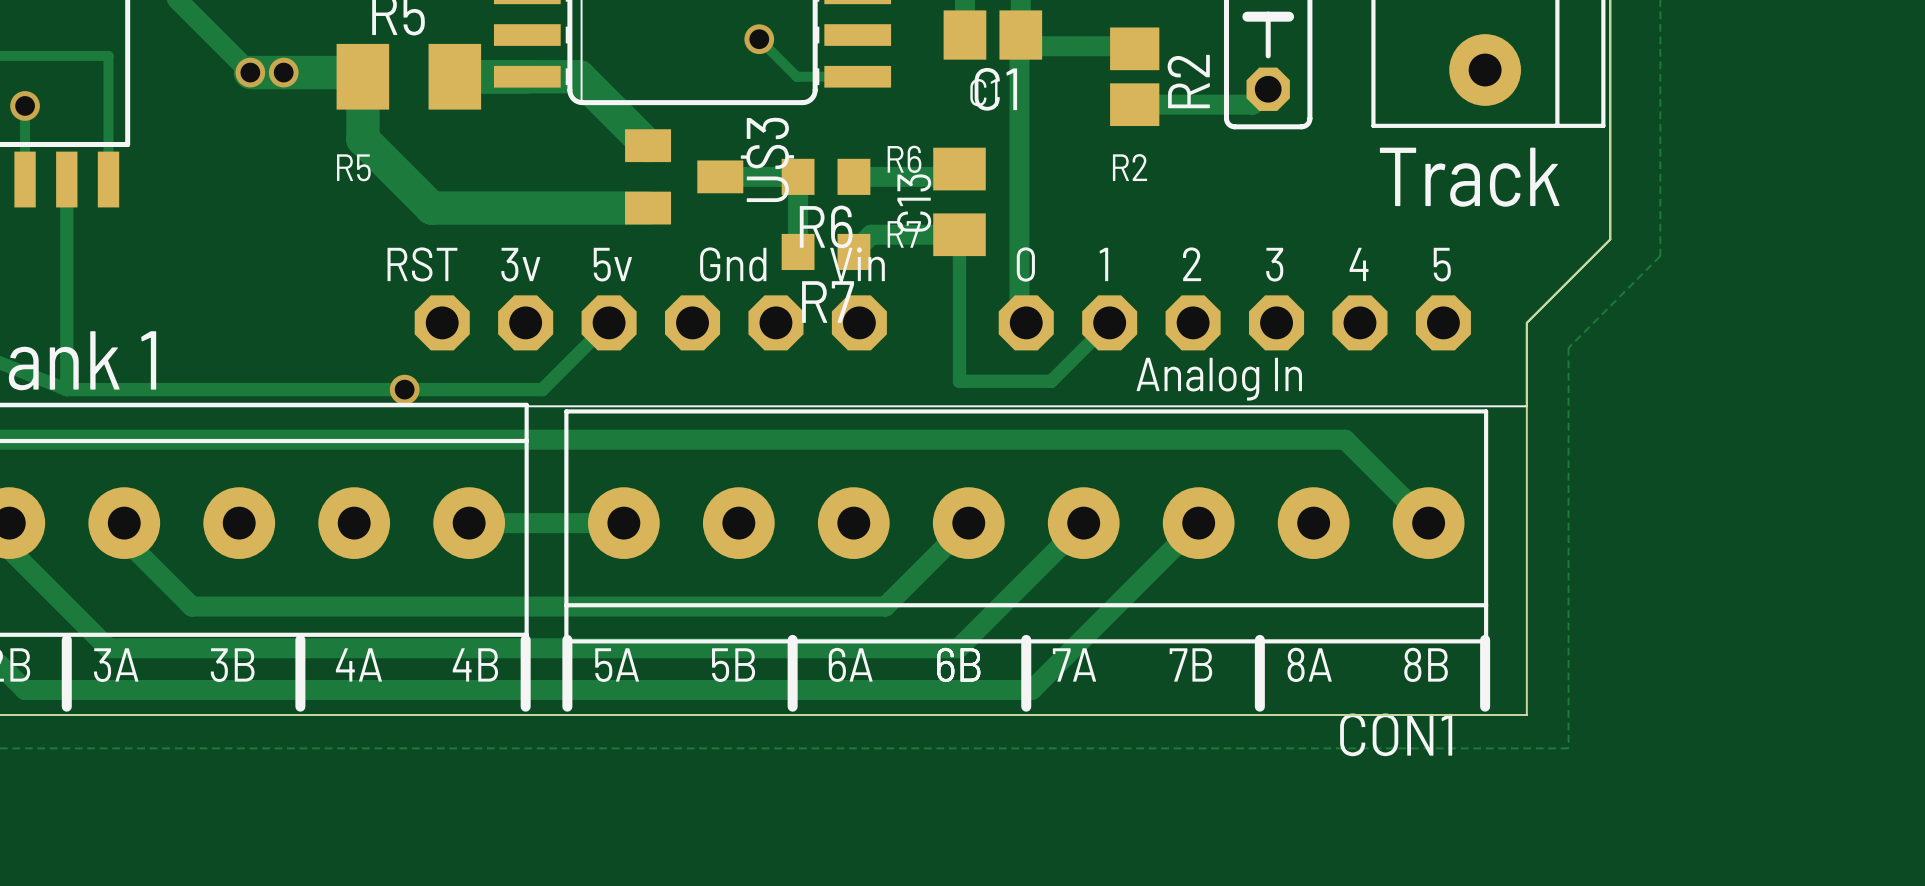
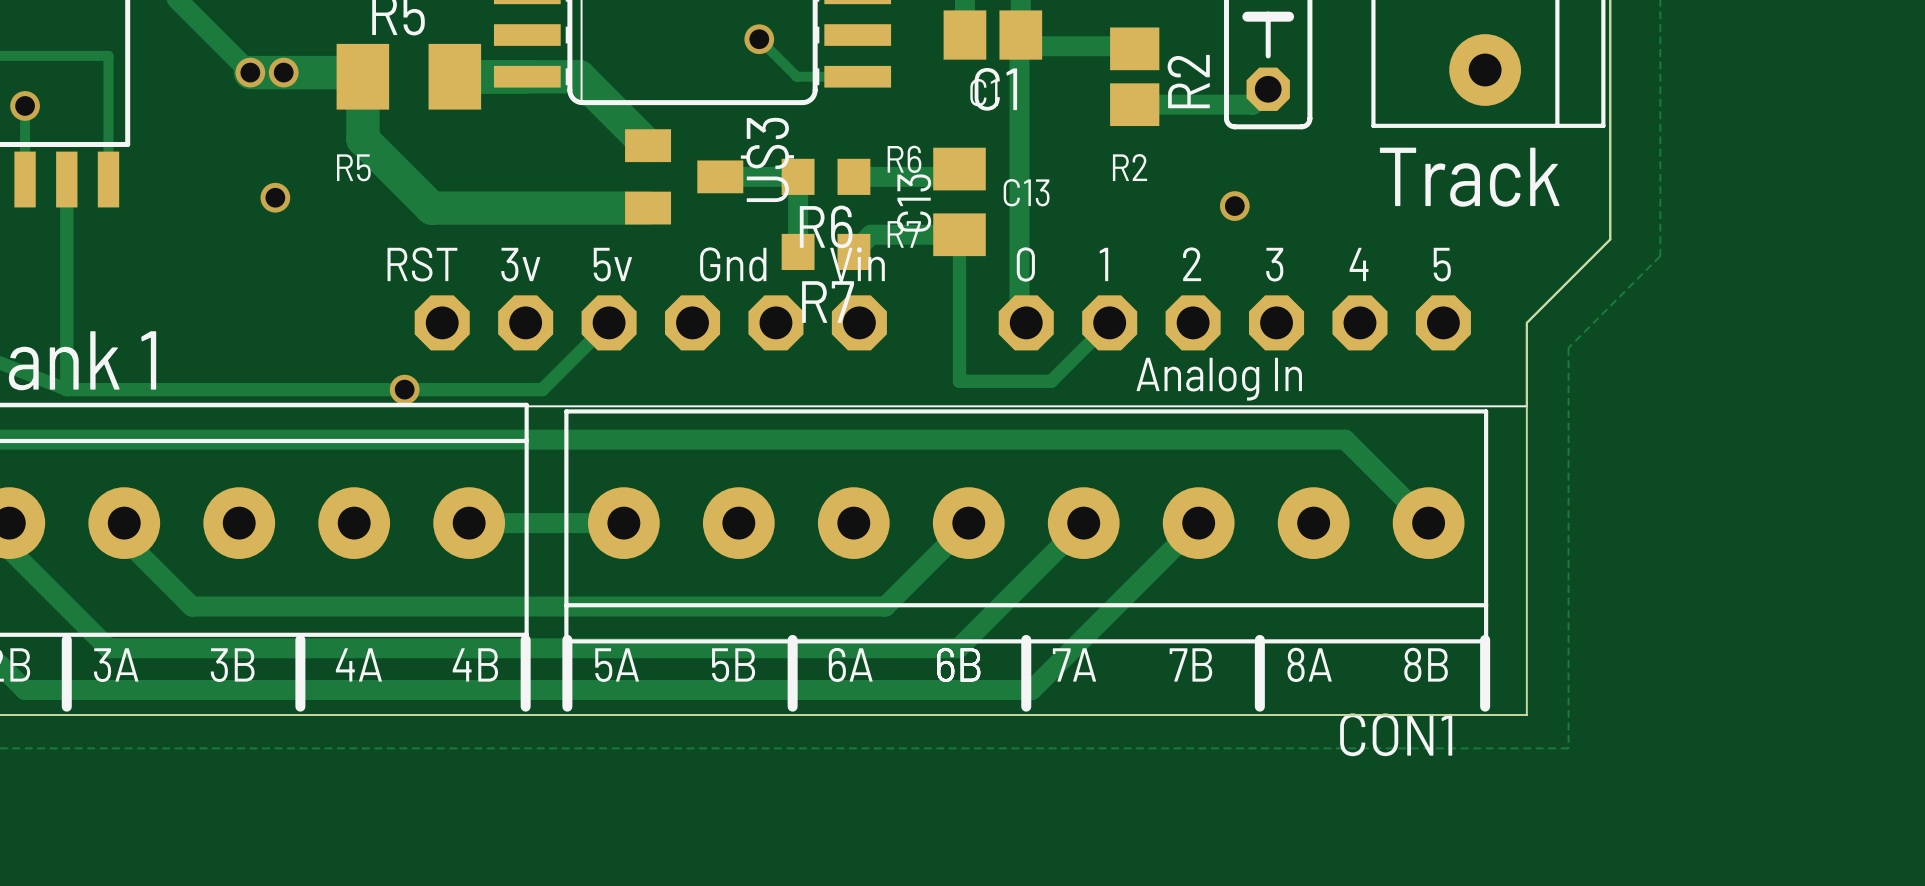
text: none -> C13 (1026, 192)
via: none -> (275, 197)
via: none -> (1234, 206)

